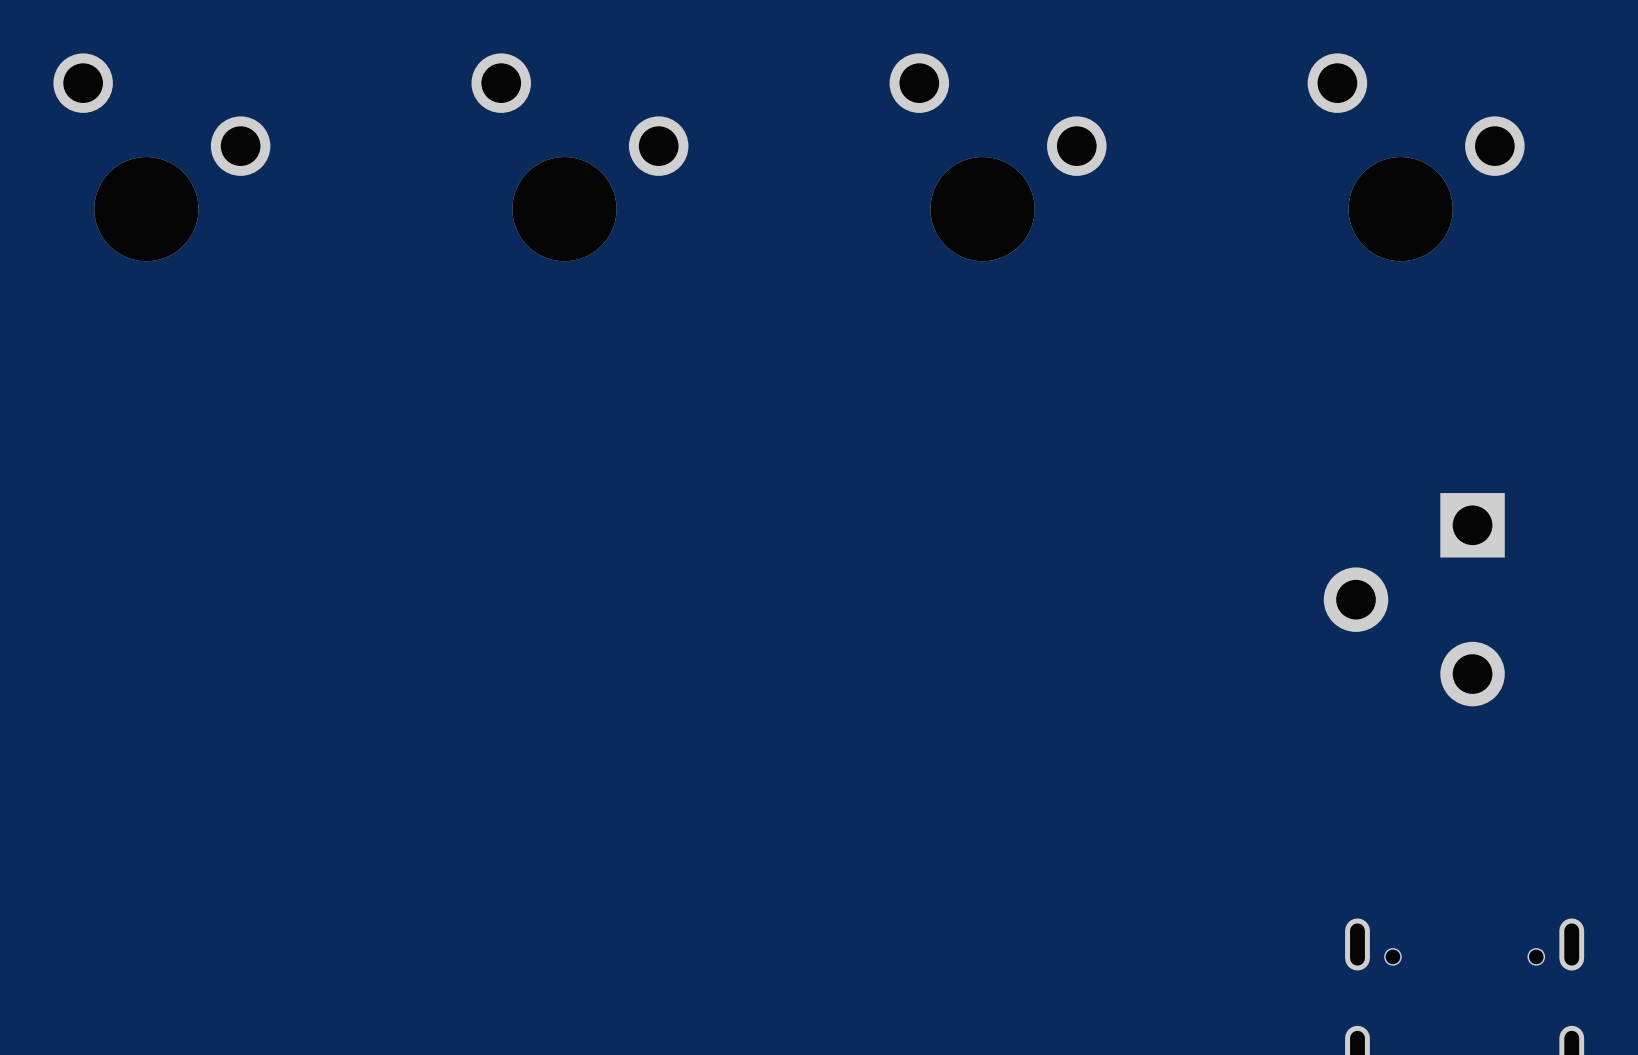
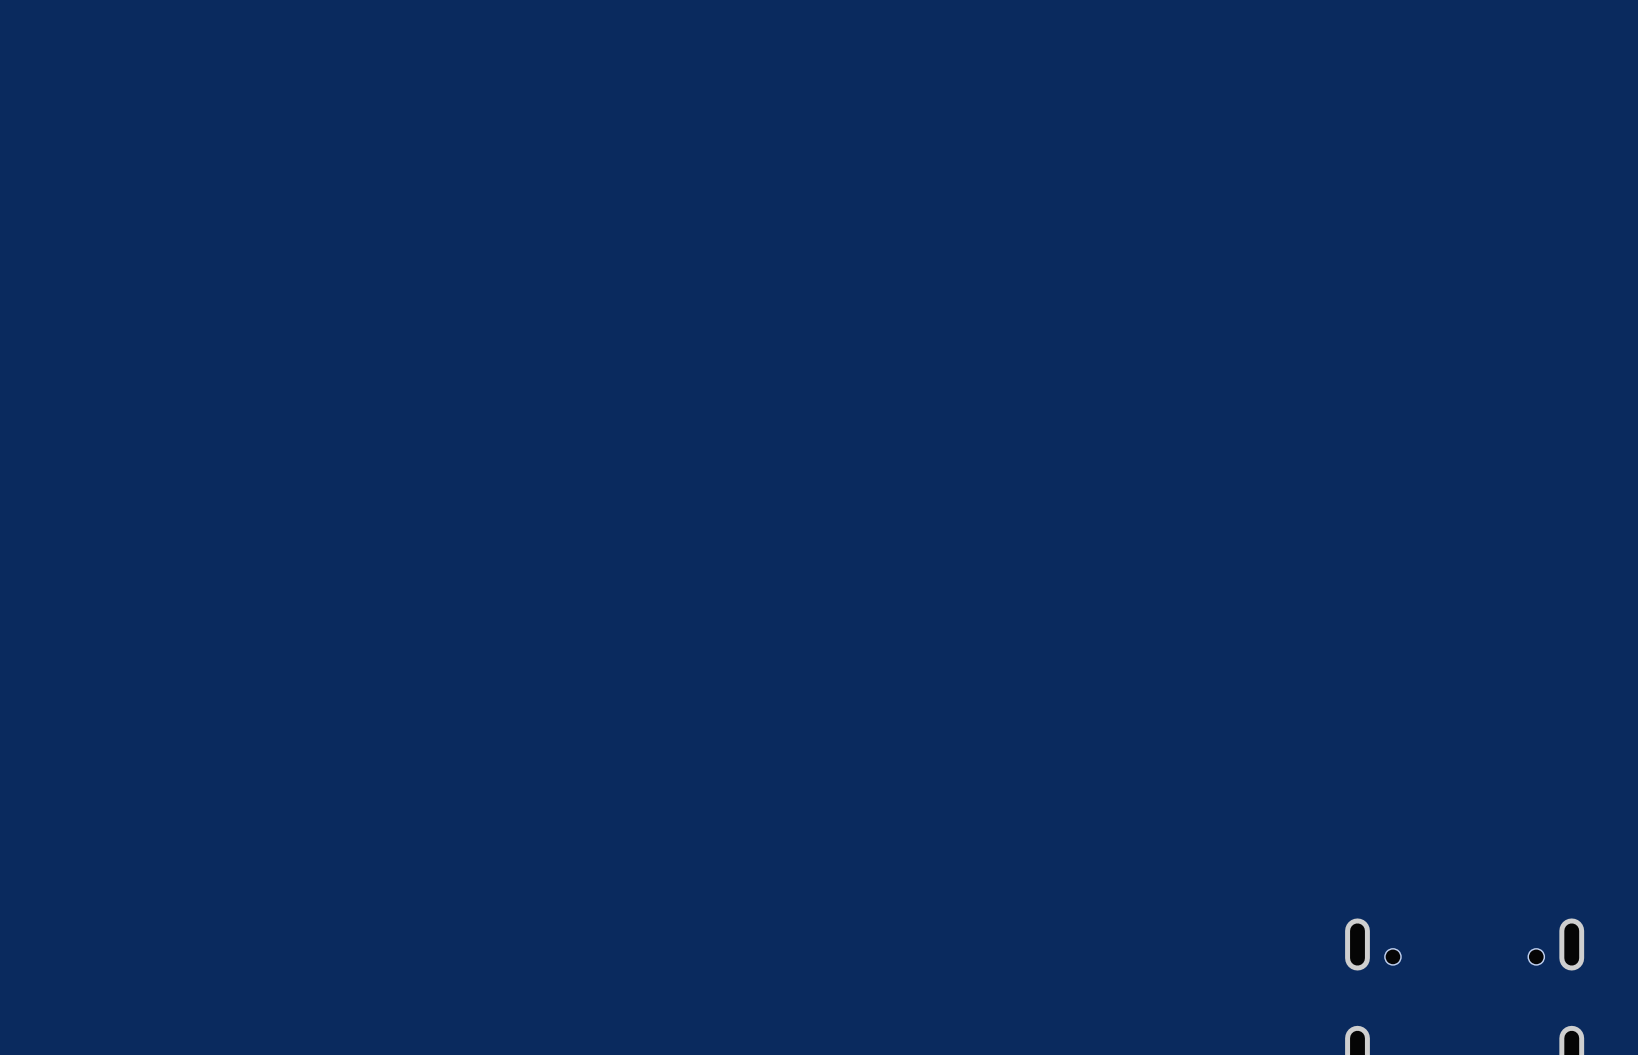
part: (161, 157) -> none
part: (579, 157) -> none
part: (998, 157) -> none
part: (1416, 157) -> none
part: (1414, 599) -> none

